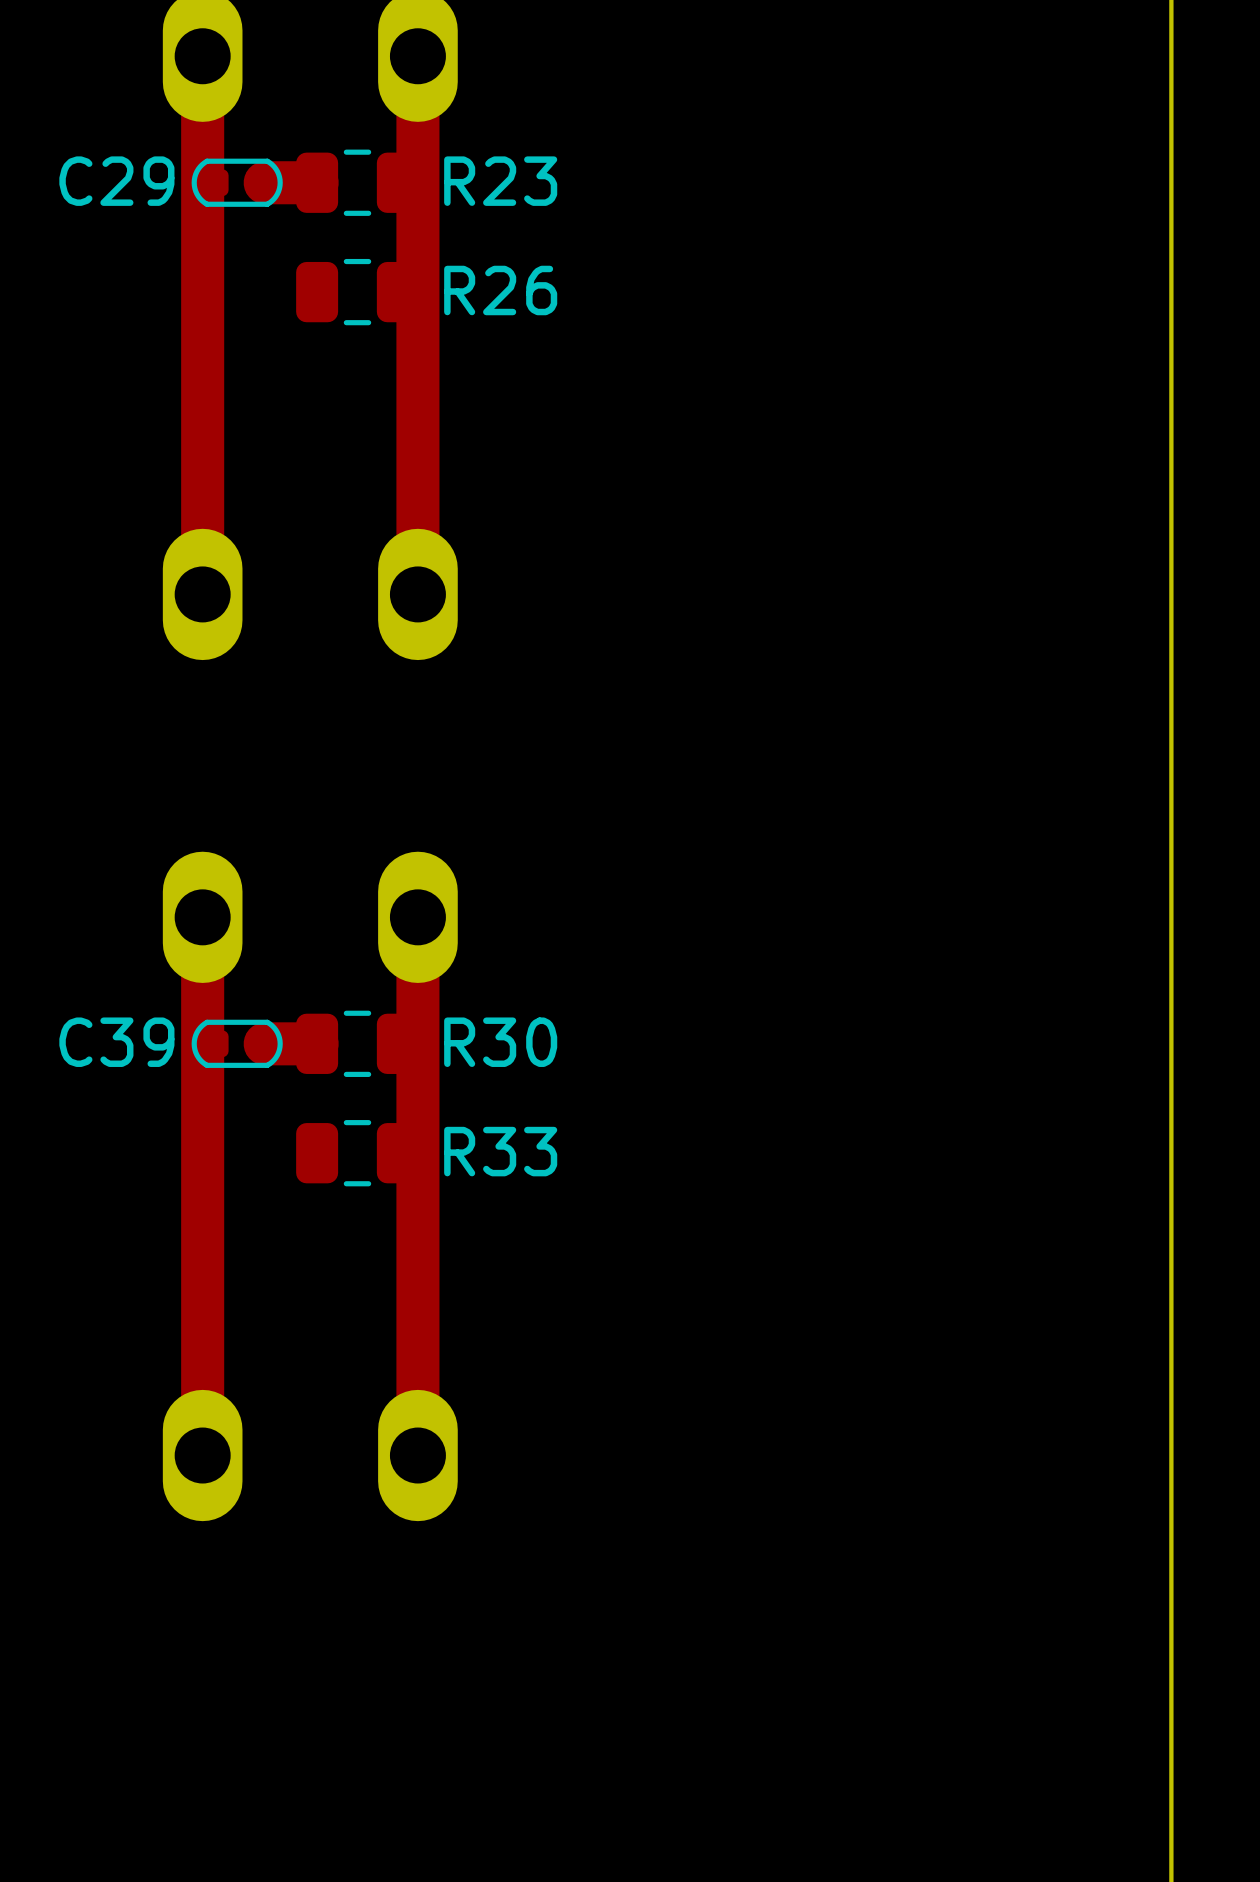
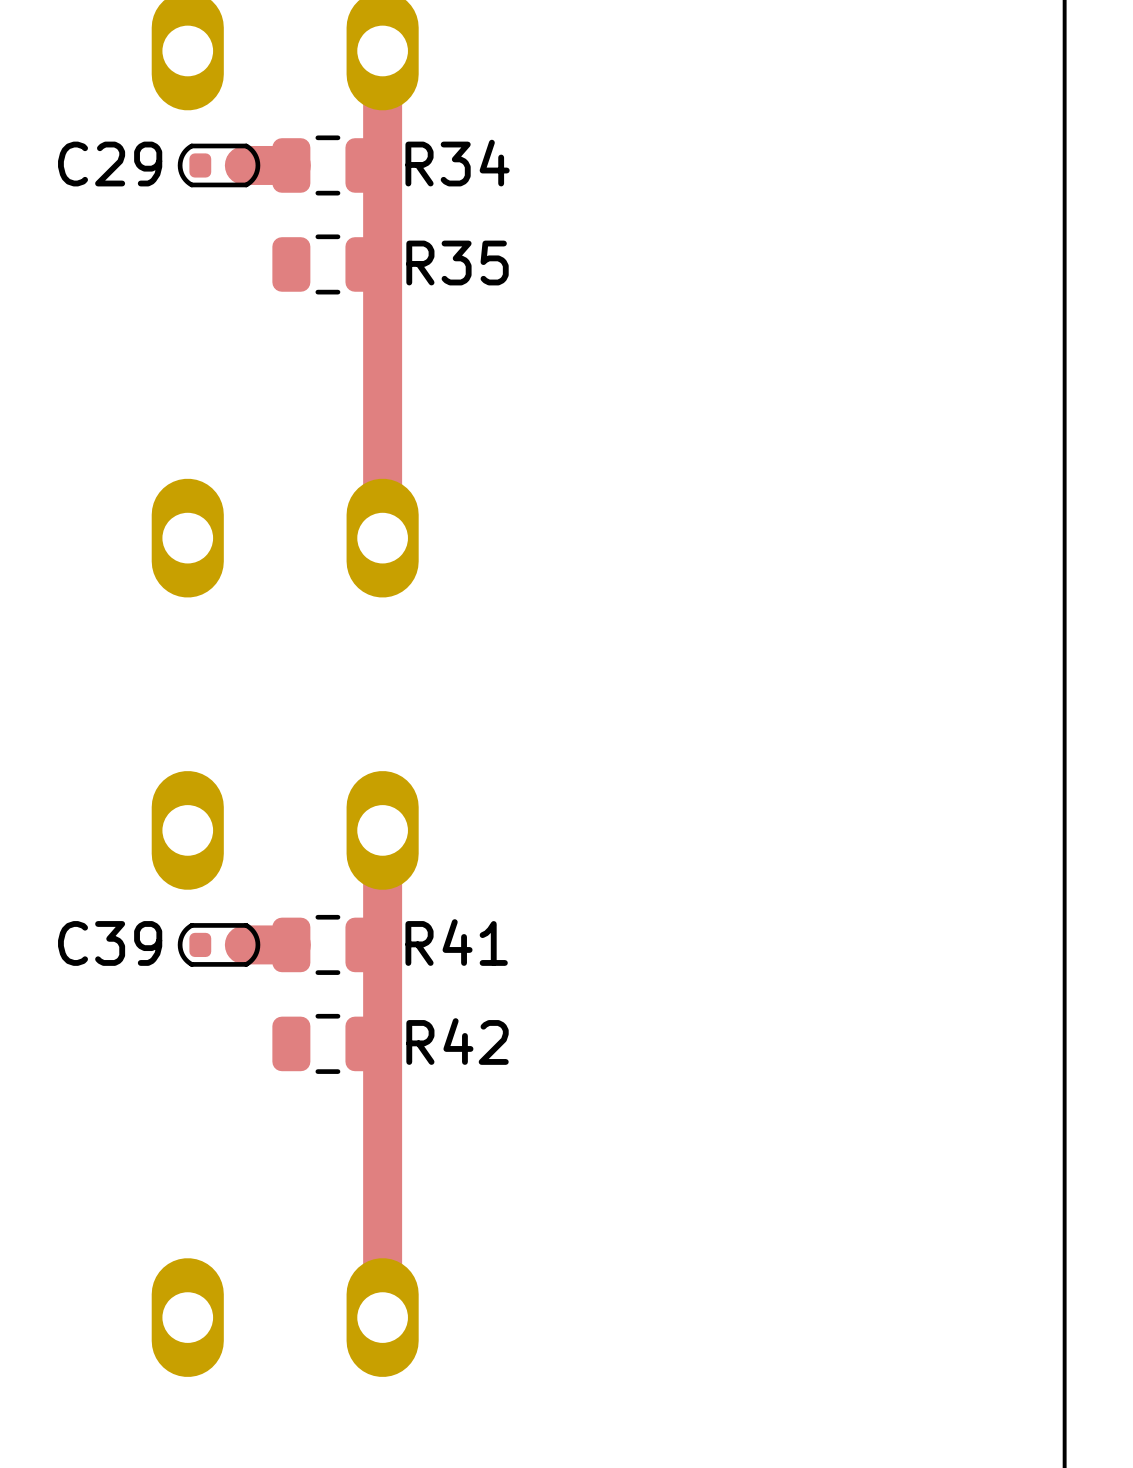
top track: (202, 56) (202, 594) -> none
R23 name: R23 (500, 181) -> R34 (457, 163)
R26 name: R26 (500, 290) -> R35 (457, 263)
top track: (202, 917) (202, 1455) -> none
R30 name: R30 (500, 1042) -> R41 (456, 942)
R33 name: R33 (500, 1151) -> R42 (457, 1041)

